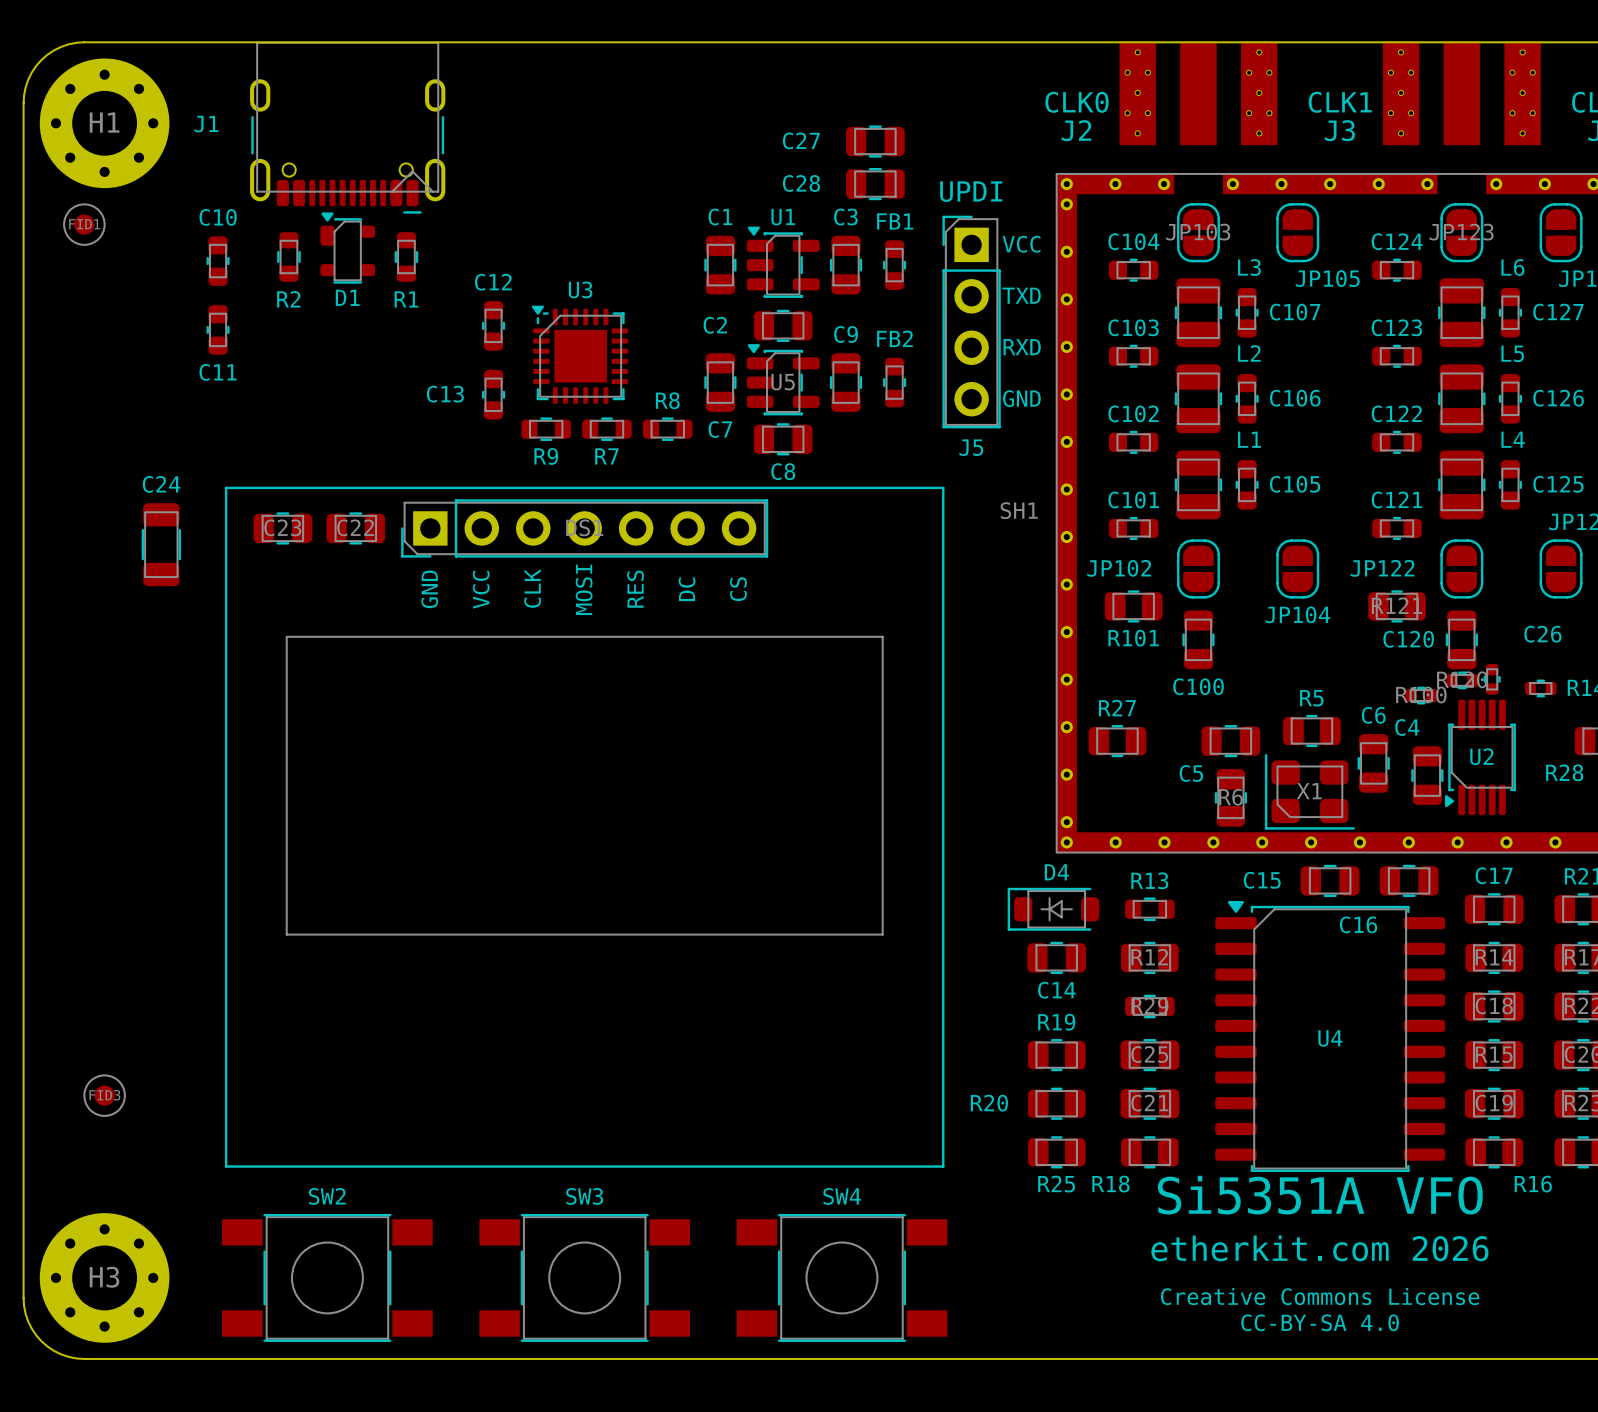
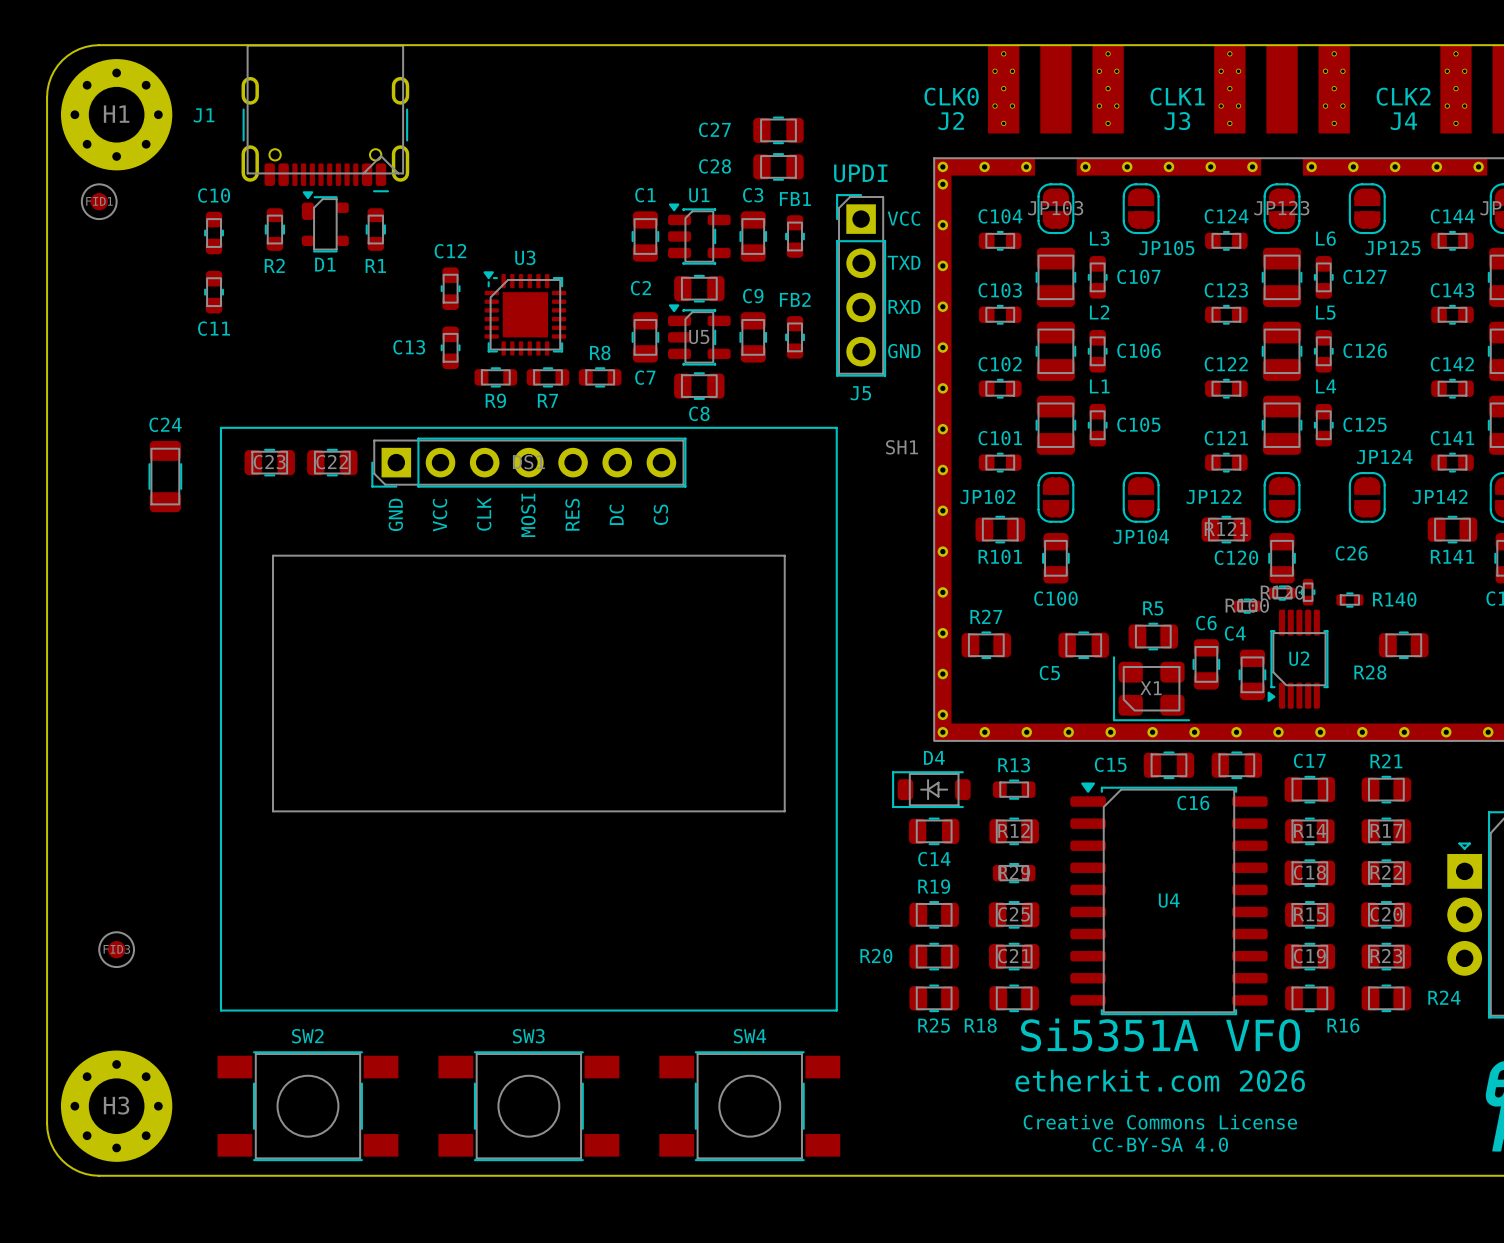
R6: (1230, 797) -> none

